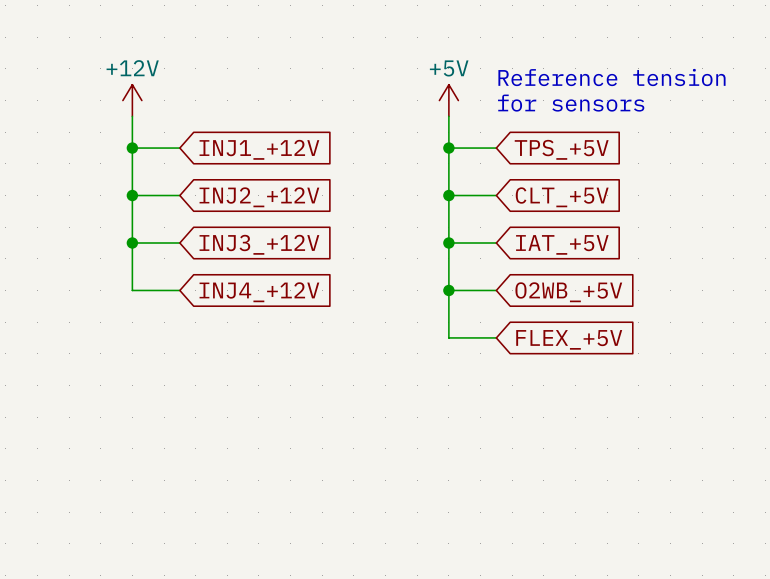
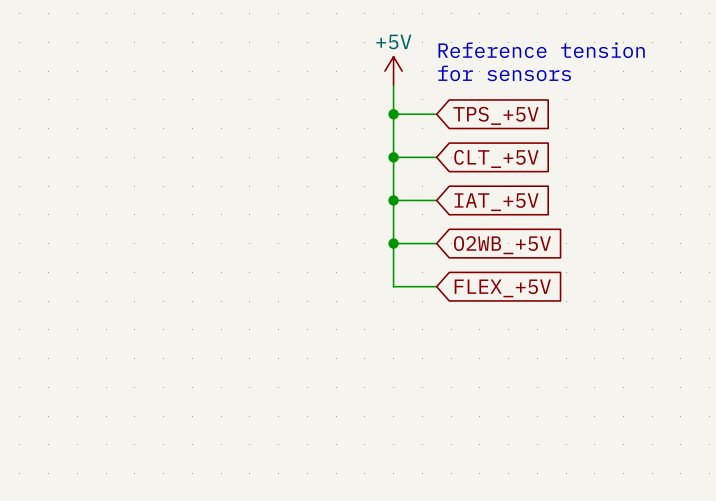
power symbol: +12V (132, 100) -> none
wire: (132, 116) (132, 290) (179, 290) -> none
wire: (132, 148) (179, 148) -> none
junction: (132, 148) -> none
global label: INJ1_+12V (259, 149) -> none
wire: (132, 195) (179, 195) -> none
junction: (132, 195) -> none
global label: INJ2_+12V (259, 197) -> none
wire: (132, 242) (179, 242) -> none
junction: (132, 242) -> none
global label: INJ3_+12V (259, 244) -> none
global label: INJ4_+12V (259, 292) -> none

